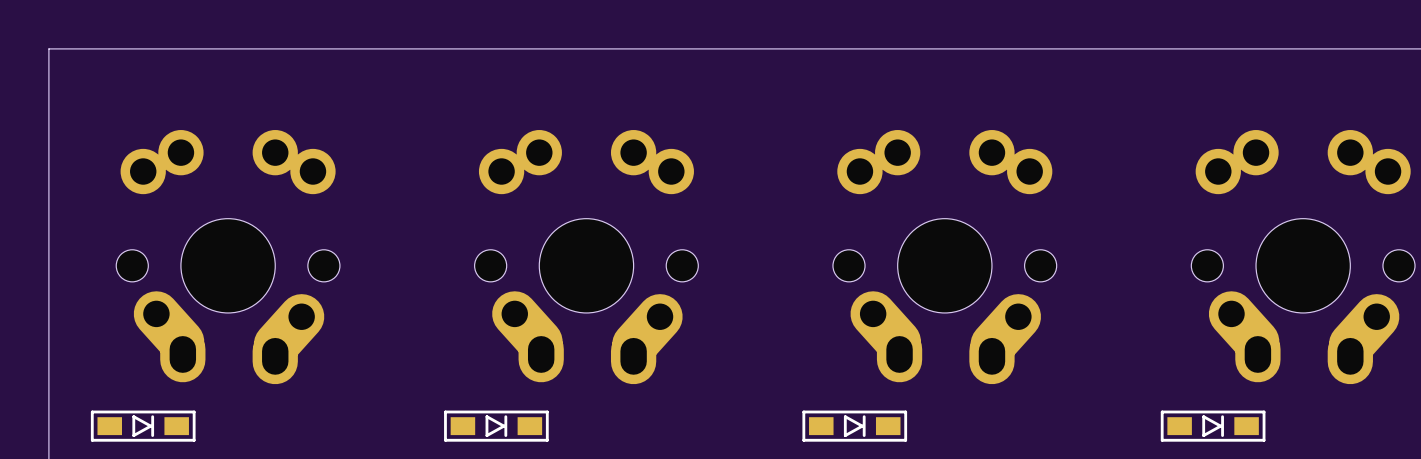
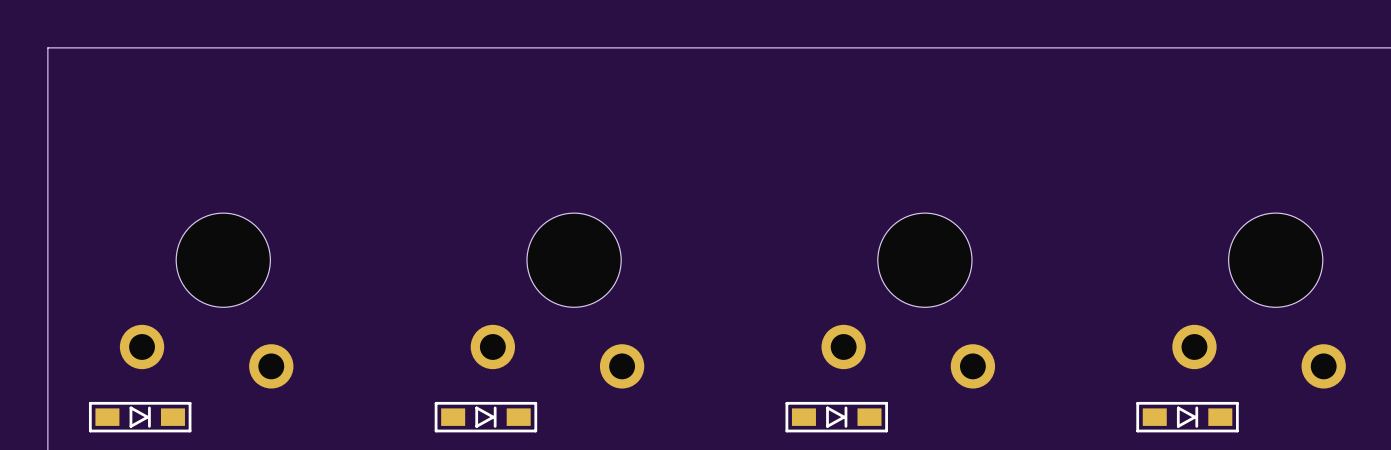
part: (228, 257) -> none
part: (586, 257) -> none
part: (944, 257) -> none
part: (1303, 257) -> none
part: none -> (206, 300)
part: none -> (557, 300)
part: none -> (908, 300)
part: none -> (1259, 300)

